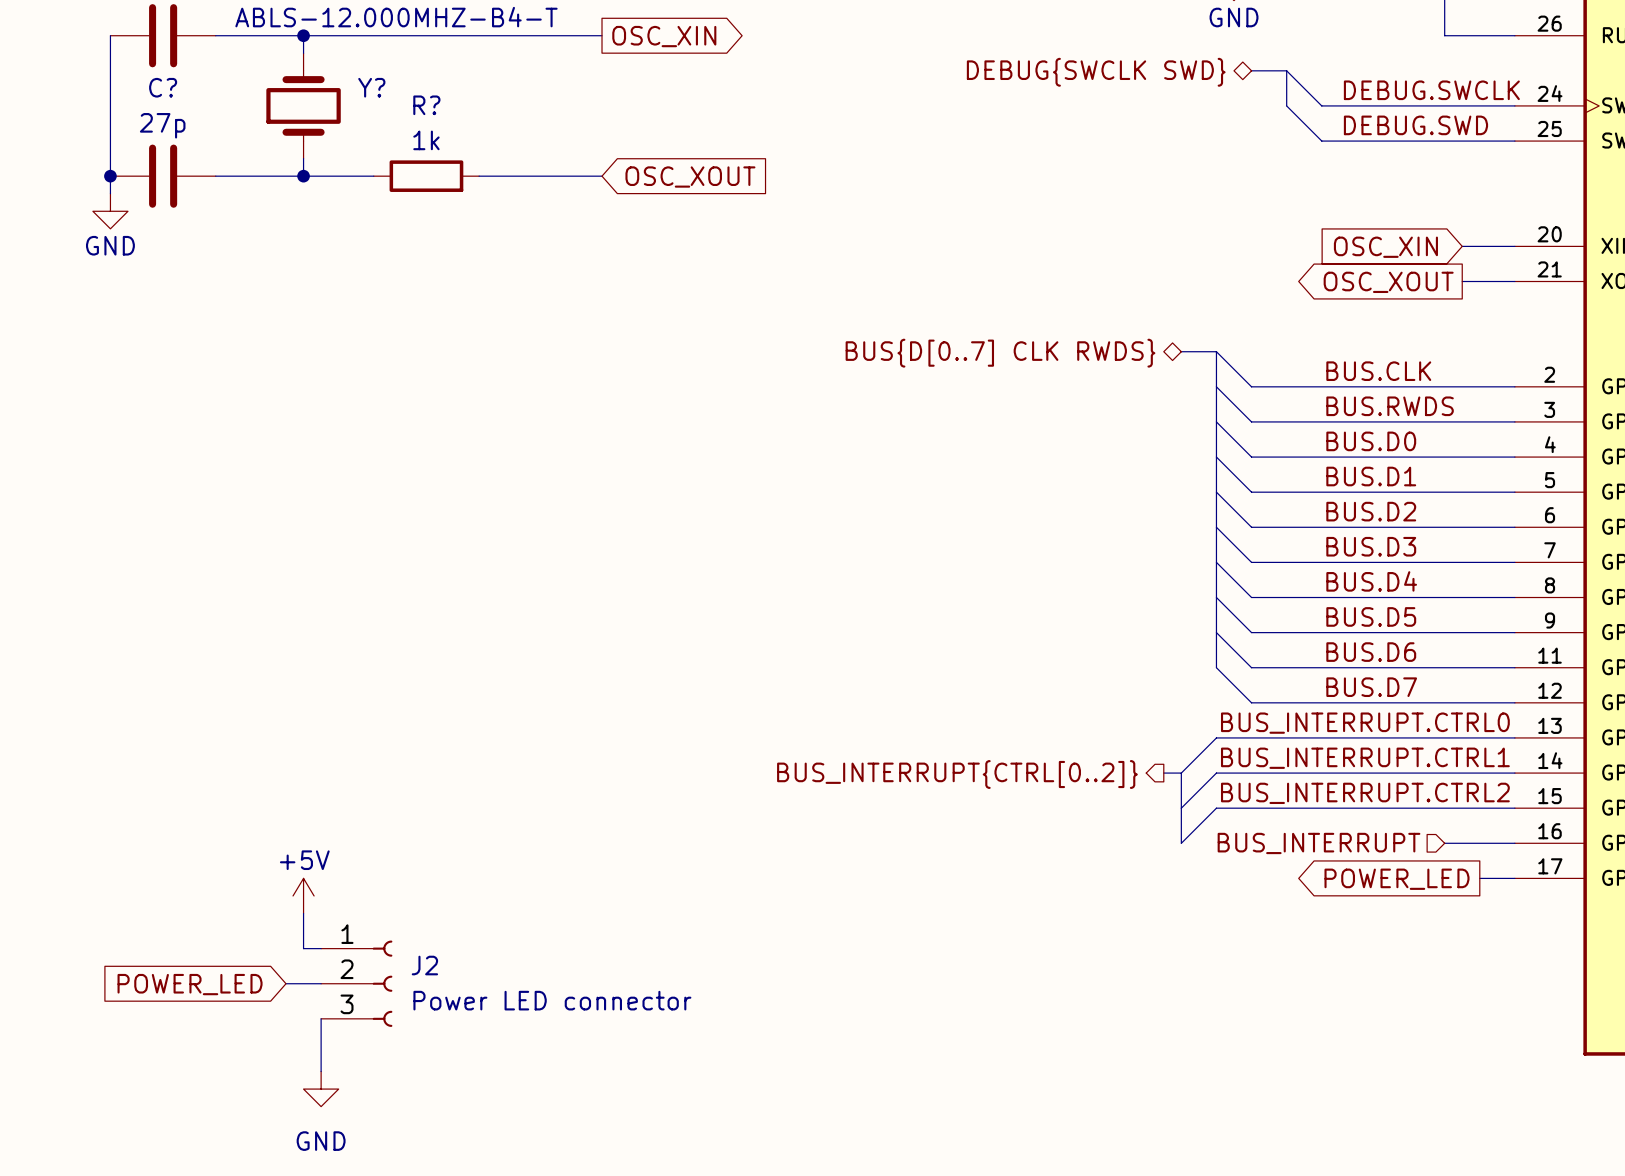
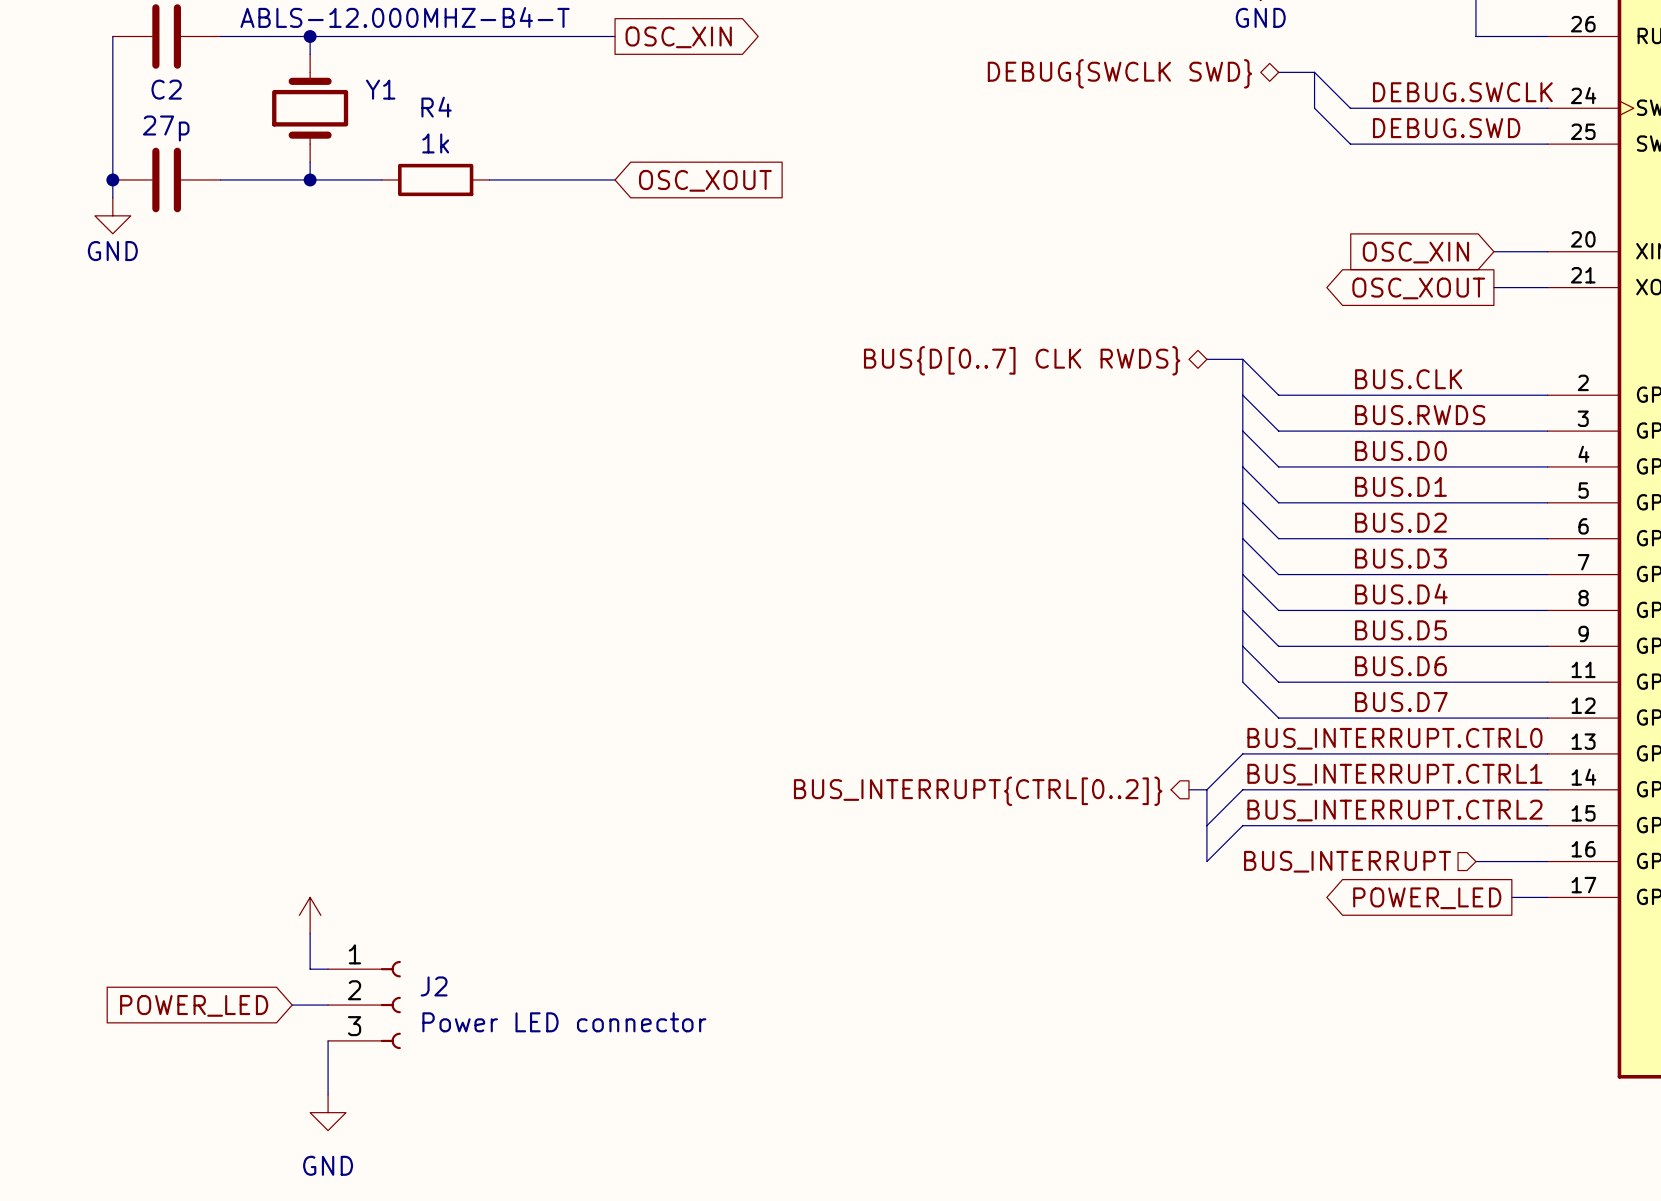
C? name: C? (163, 87) -> C2 (166, 89)
Y? name: Y? (371, 87) -> Y1 (380, 89)
R? name: R? (426, 105) -> R4 (436, 107)
power symbol text: +5V (304, 860) -> none

